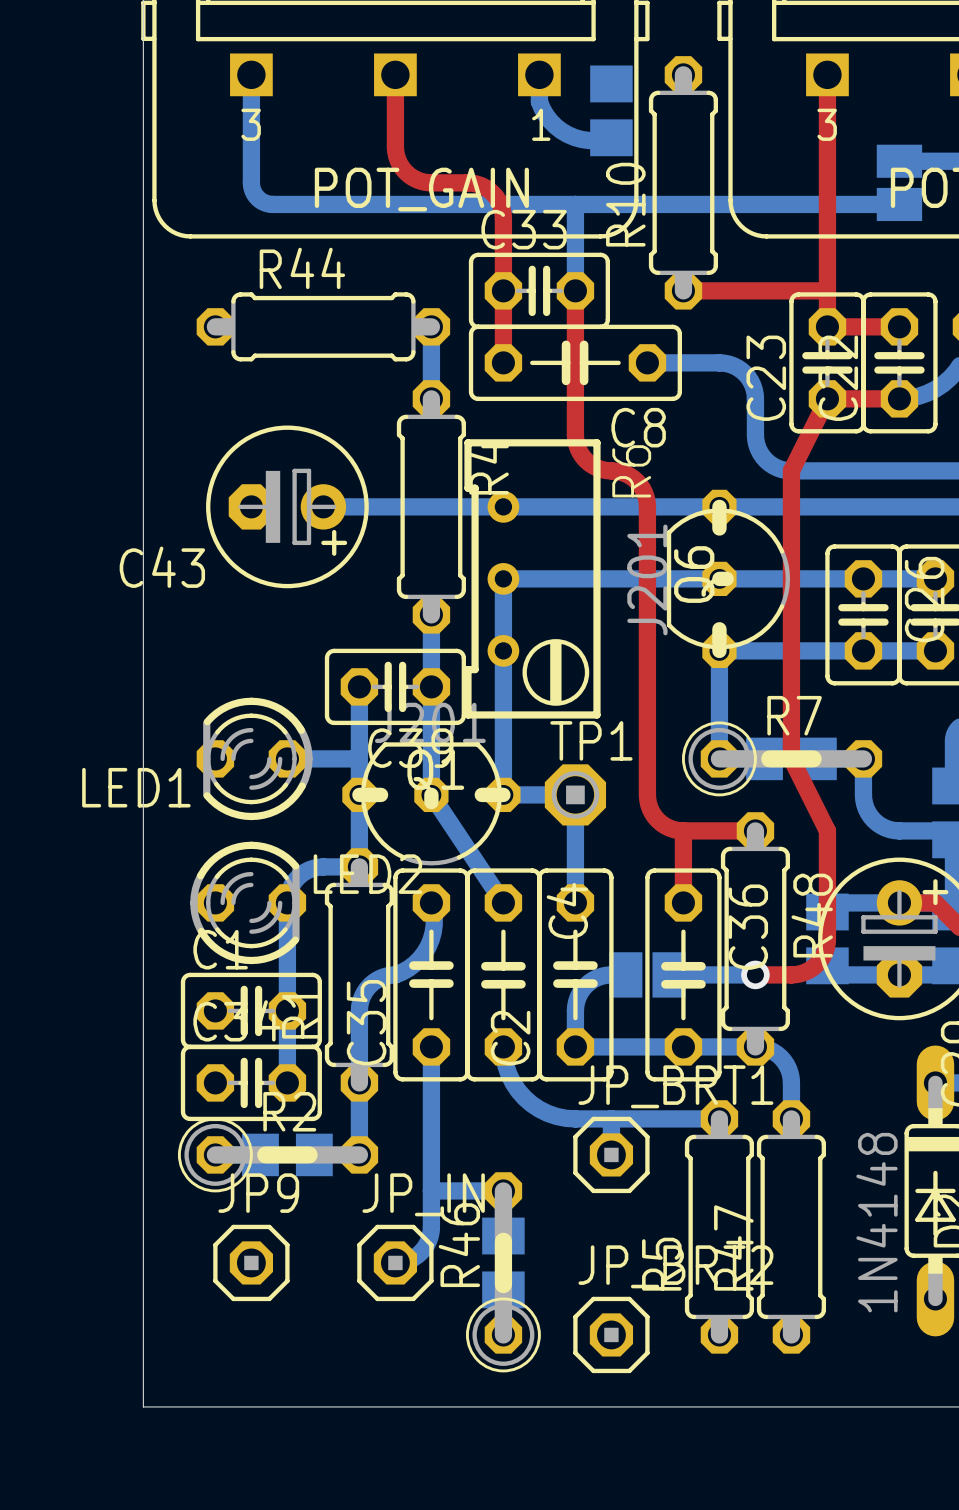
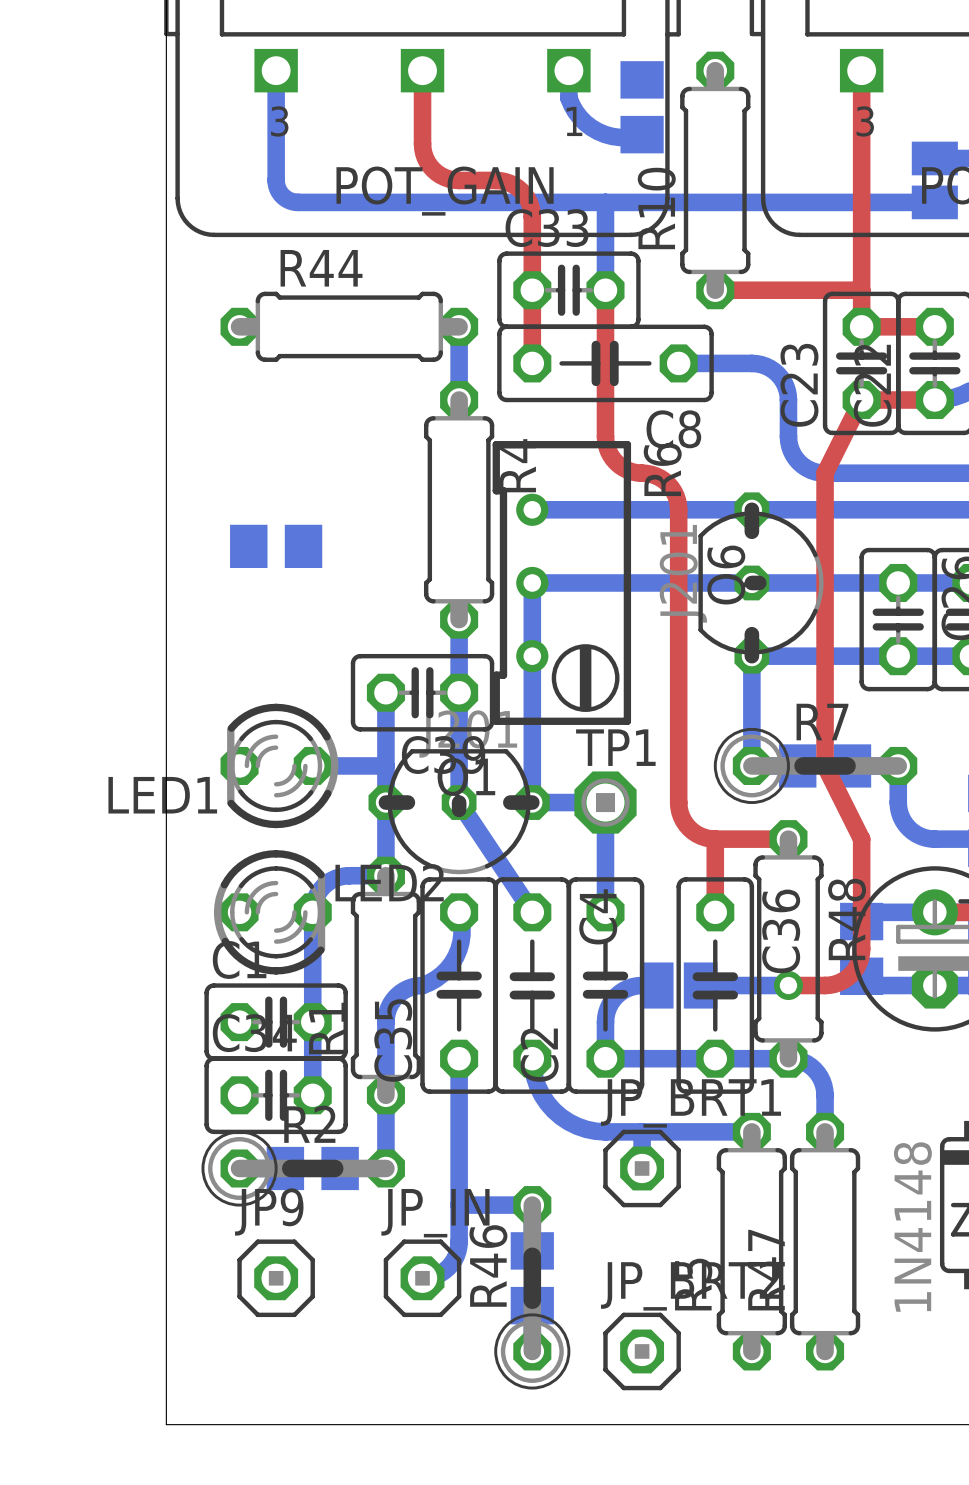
C43: (287, 506) -> none
bottom track: (323, 506) (503, 506) -> none
part: none -> (276, 546)

